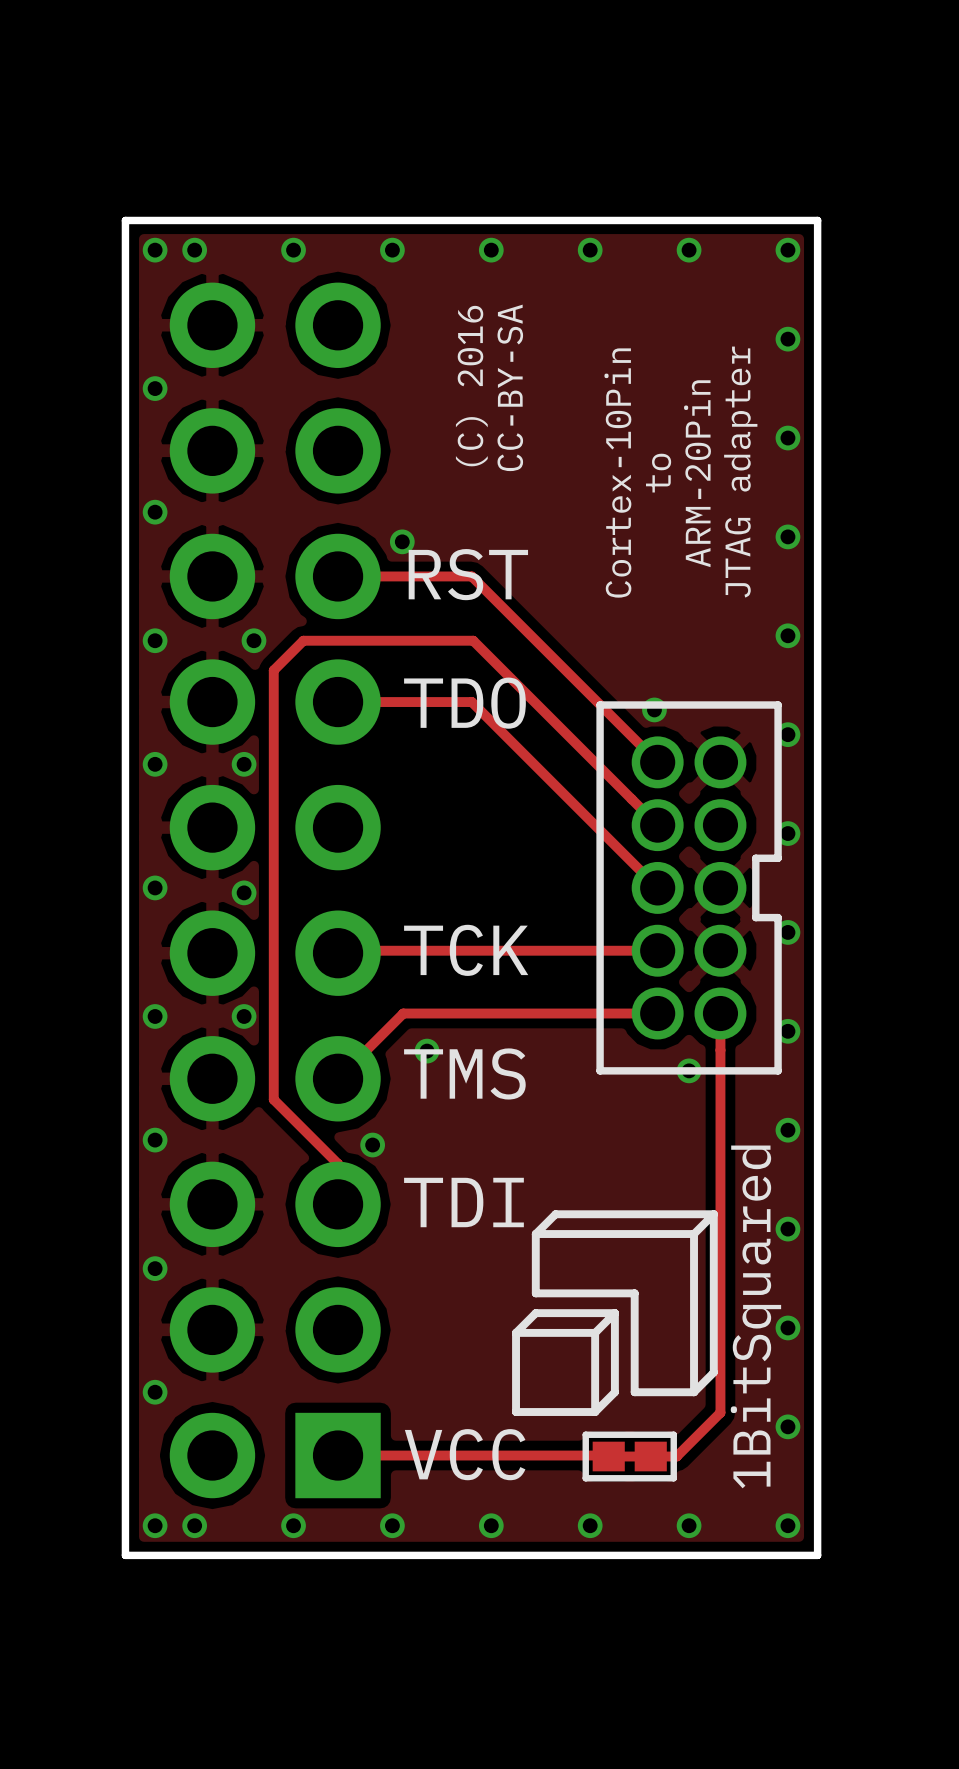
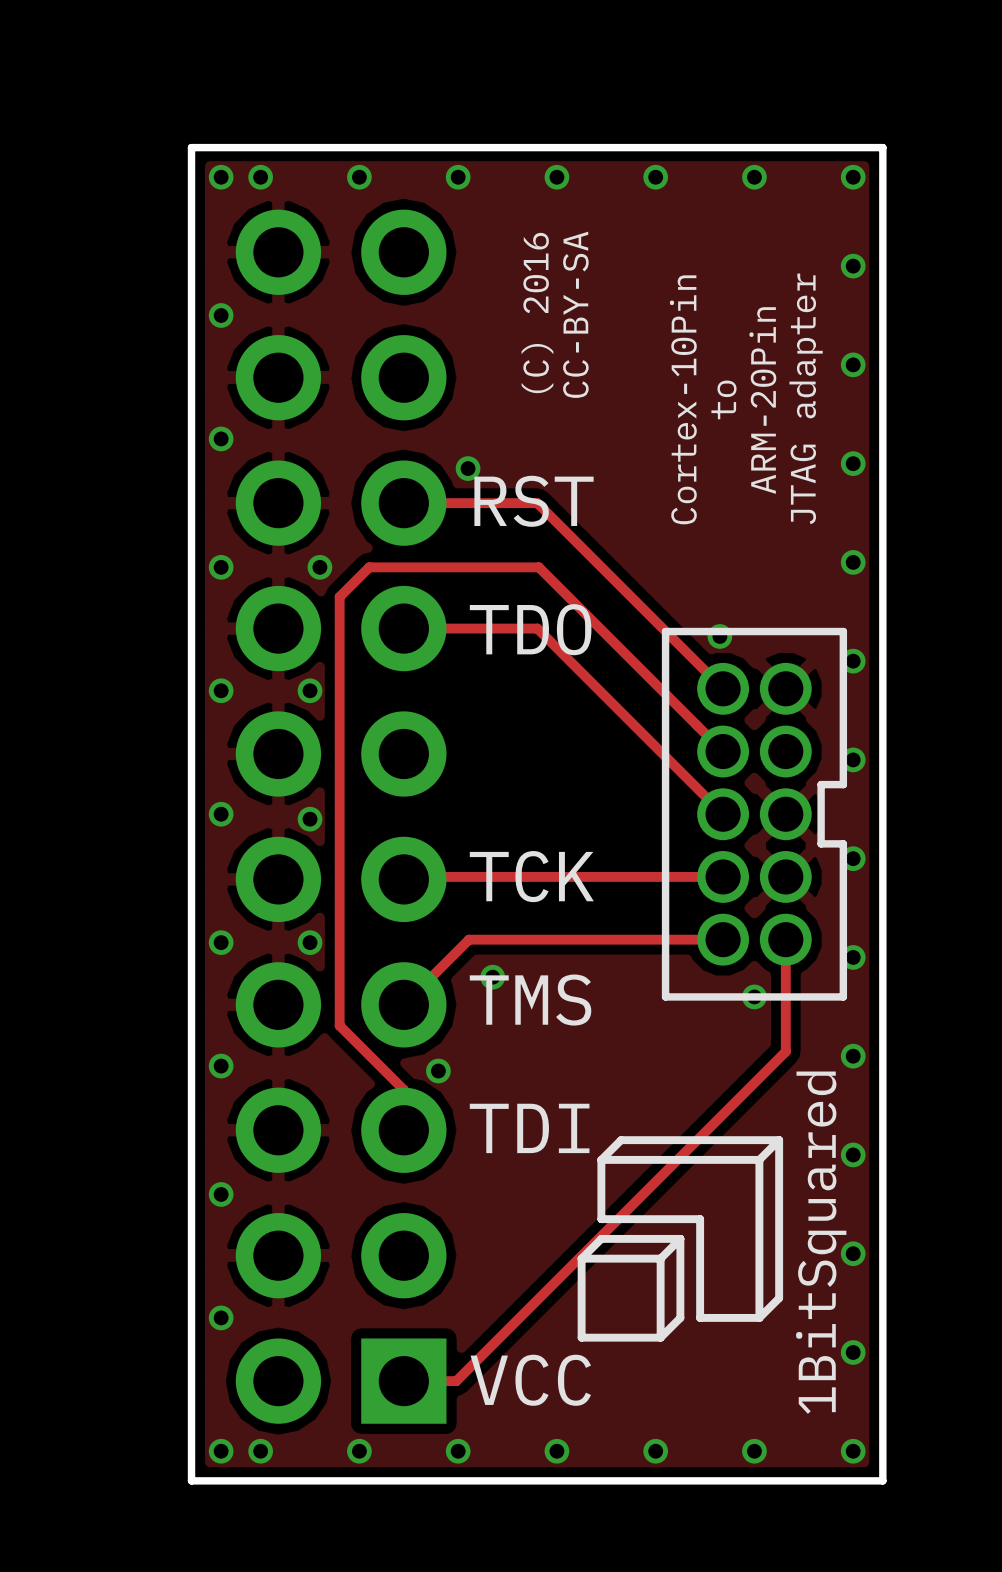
track: (720, 1125) (720, 1412) (676, 1456) (390, 1455) -> (785, 1051) (456, 1381)
part: (629, 1456) -> none

